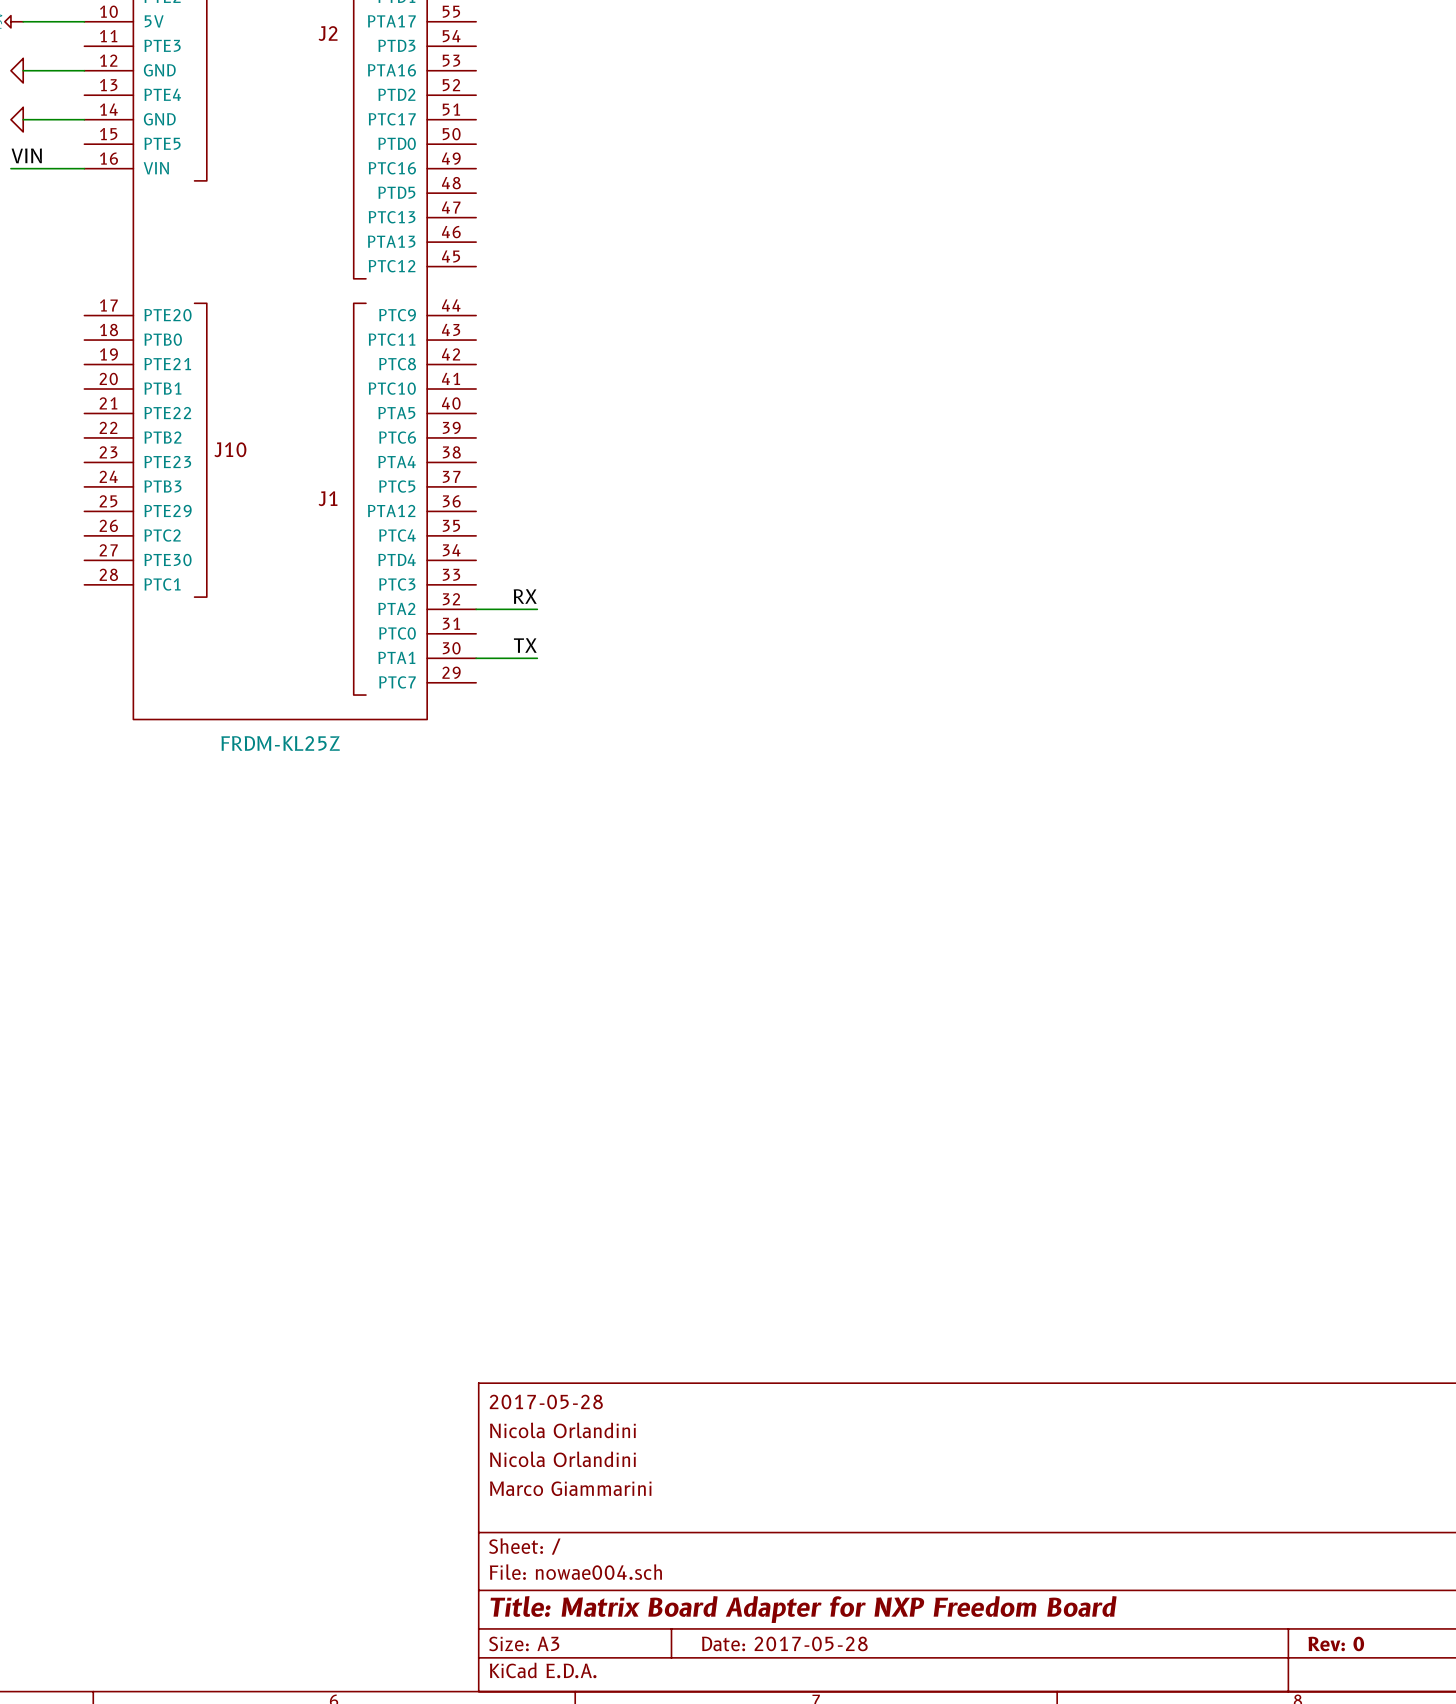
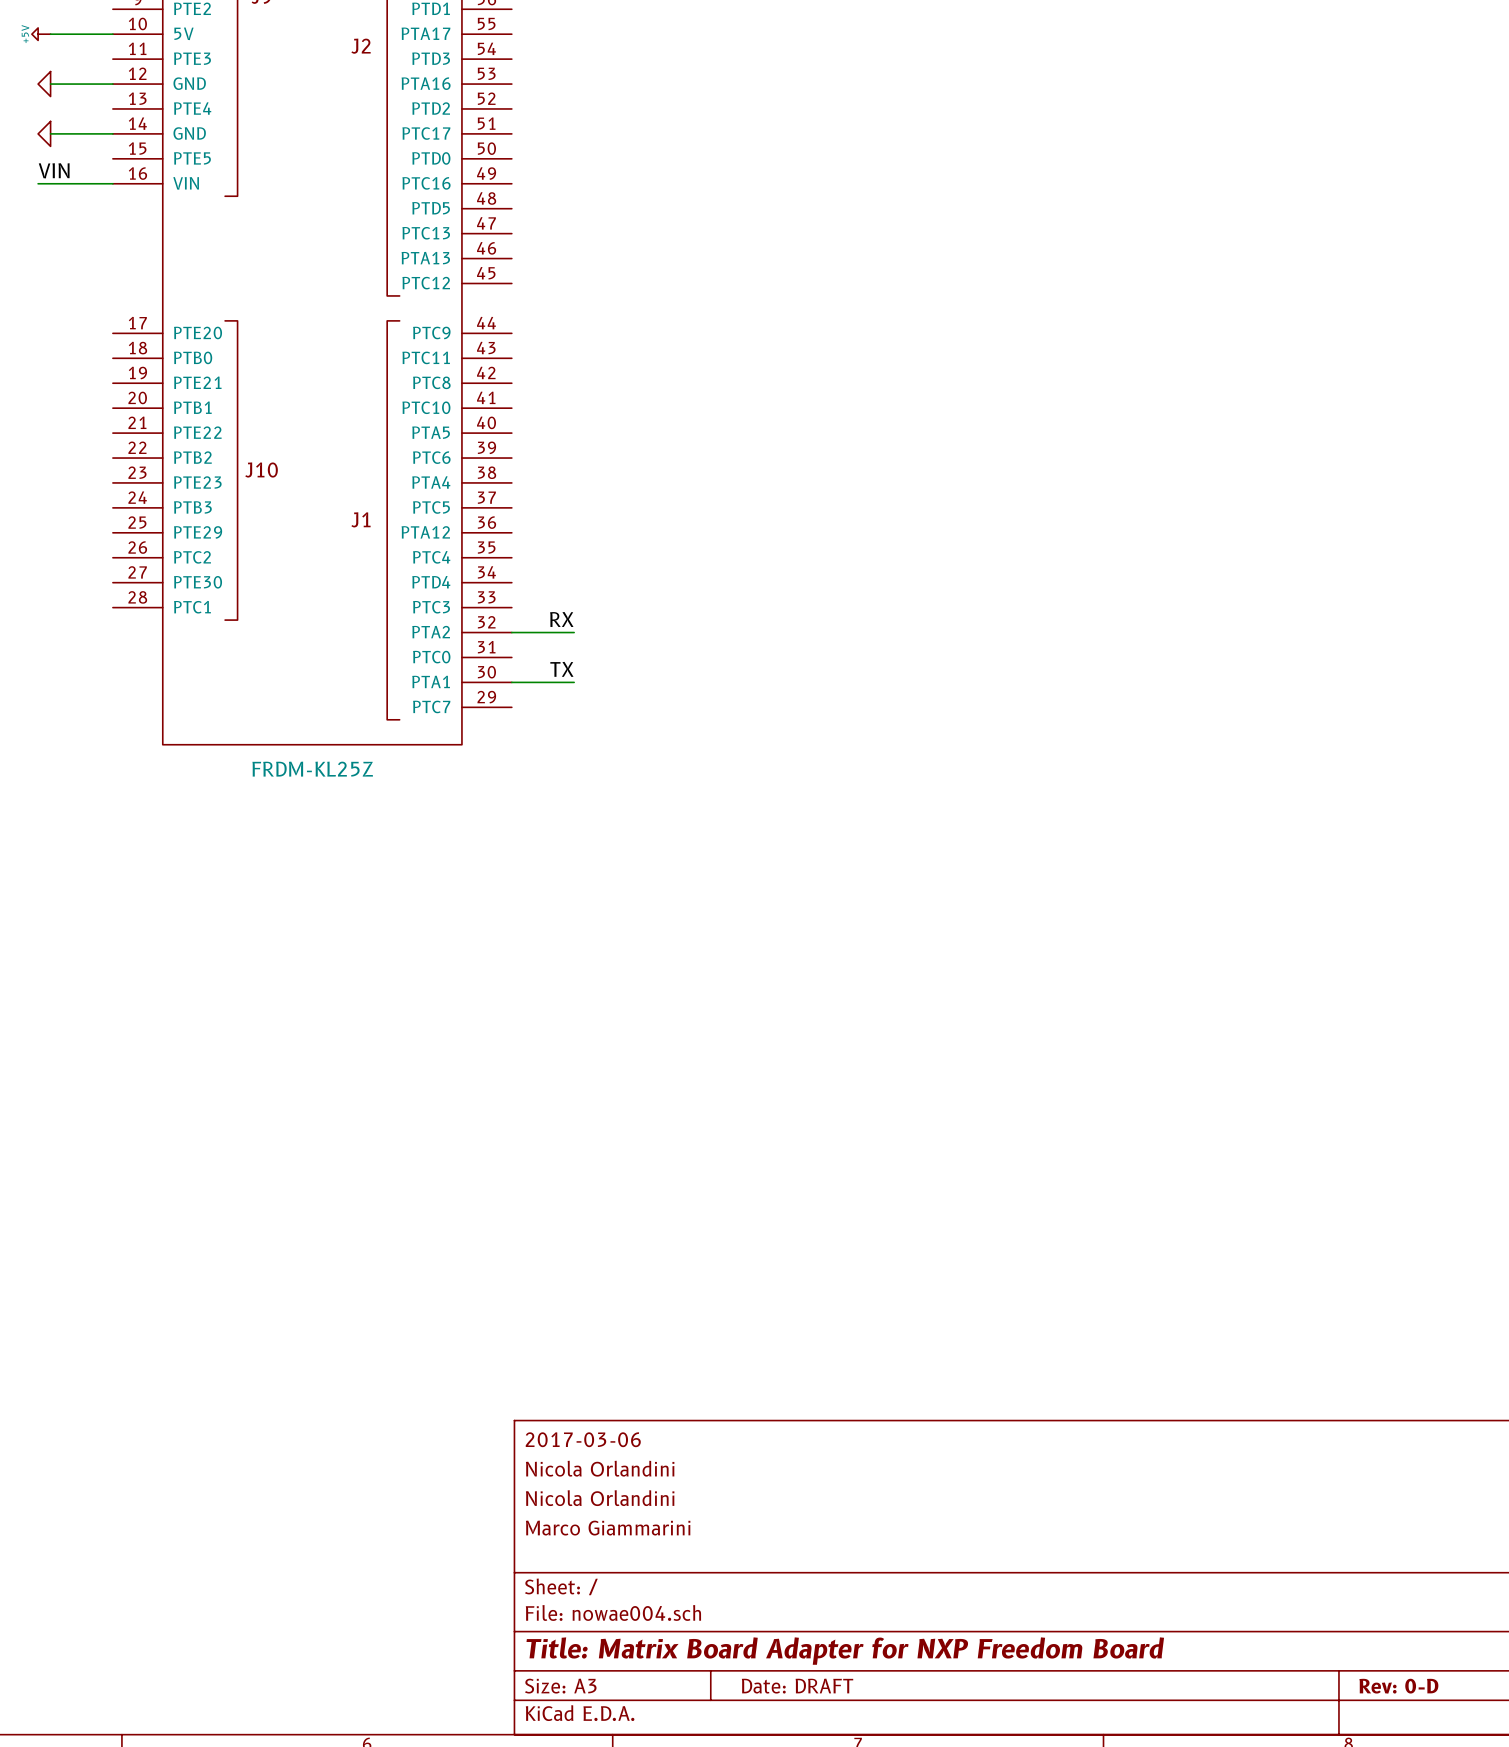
title block: 2017-05-28 (546, 1401) -> 2017-03-06 (583, 1439)
title block: Date: 2017-05-28 (784, 1643) -> Date: DRAFT (797, 1686)
title block: Rev: 0 (1336, 1644) -> Rev: 0-D (1398, 1686)

